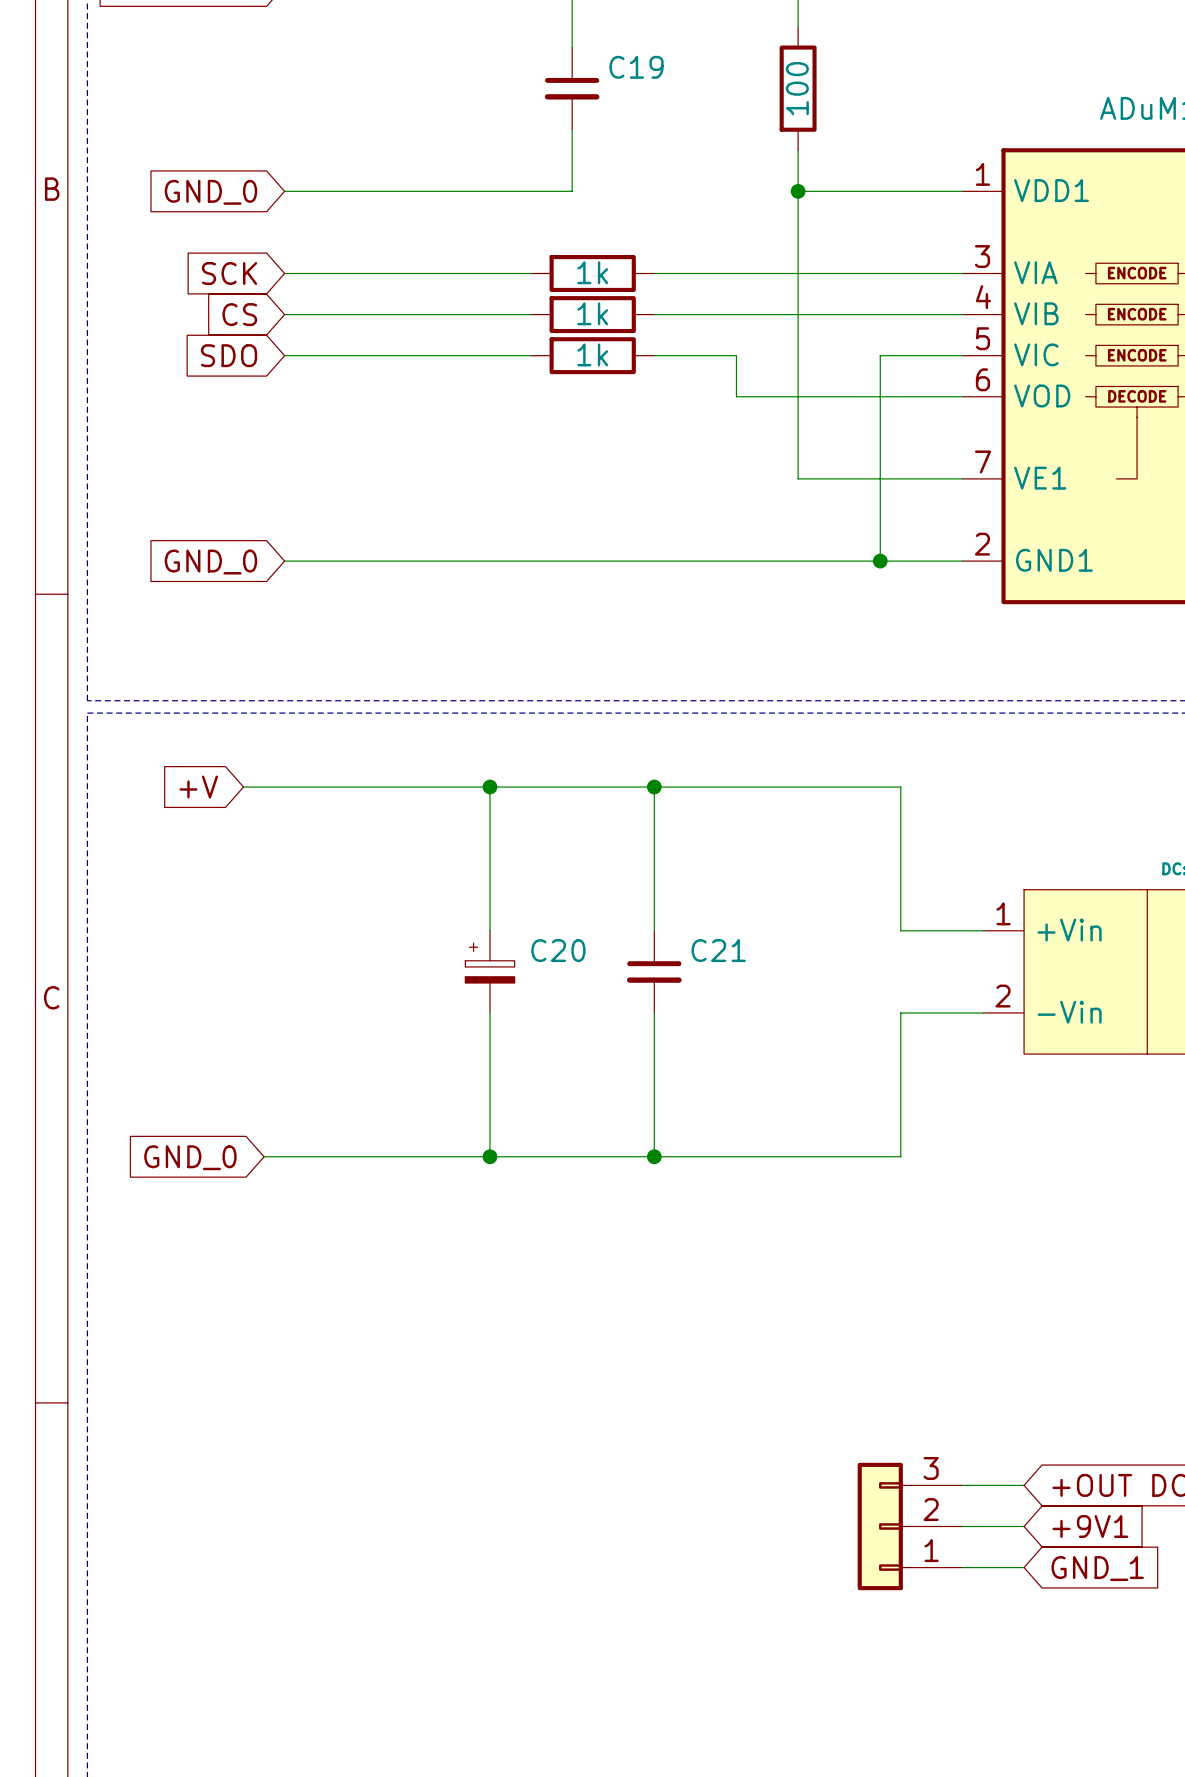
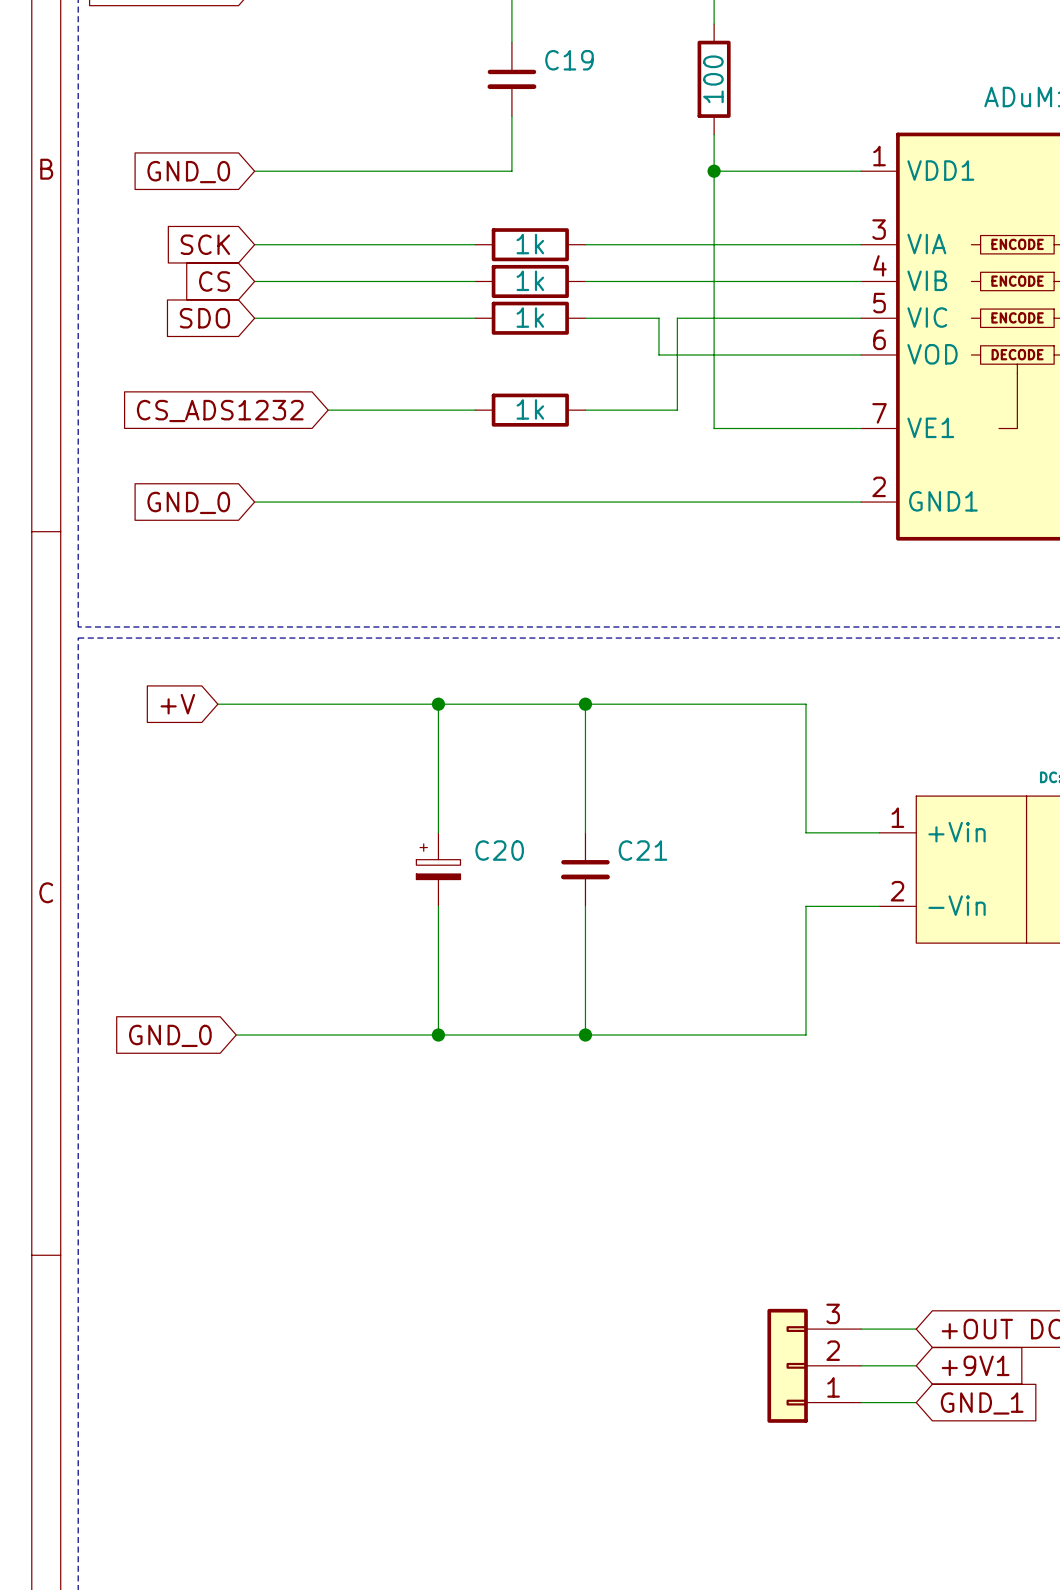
wire: (880, 355) (880, 561) -> (787, 318) (677, 318) (677, 410) (585, 410)
wire: none -> (328, 410) (475, 410)
part: none -> 1k (530, 410)
global label: none -> CS_ADS1232 (220, 411)
junction: (880, 561) -> none

